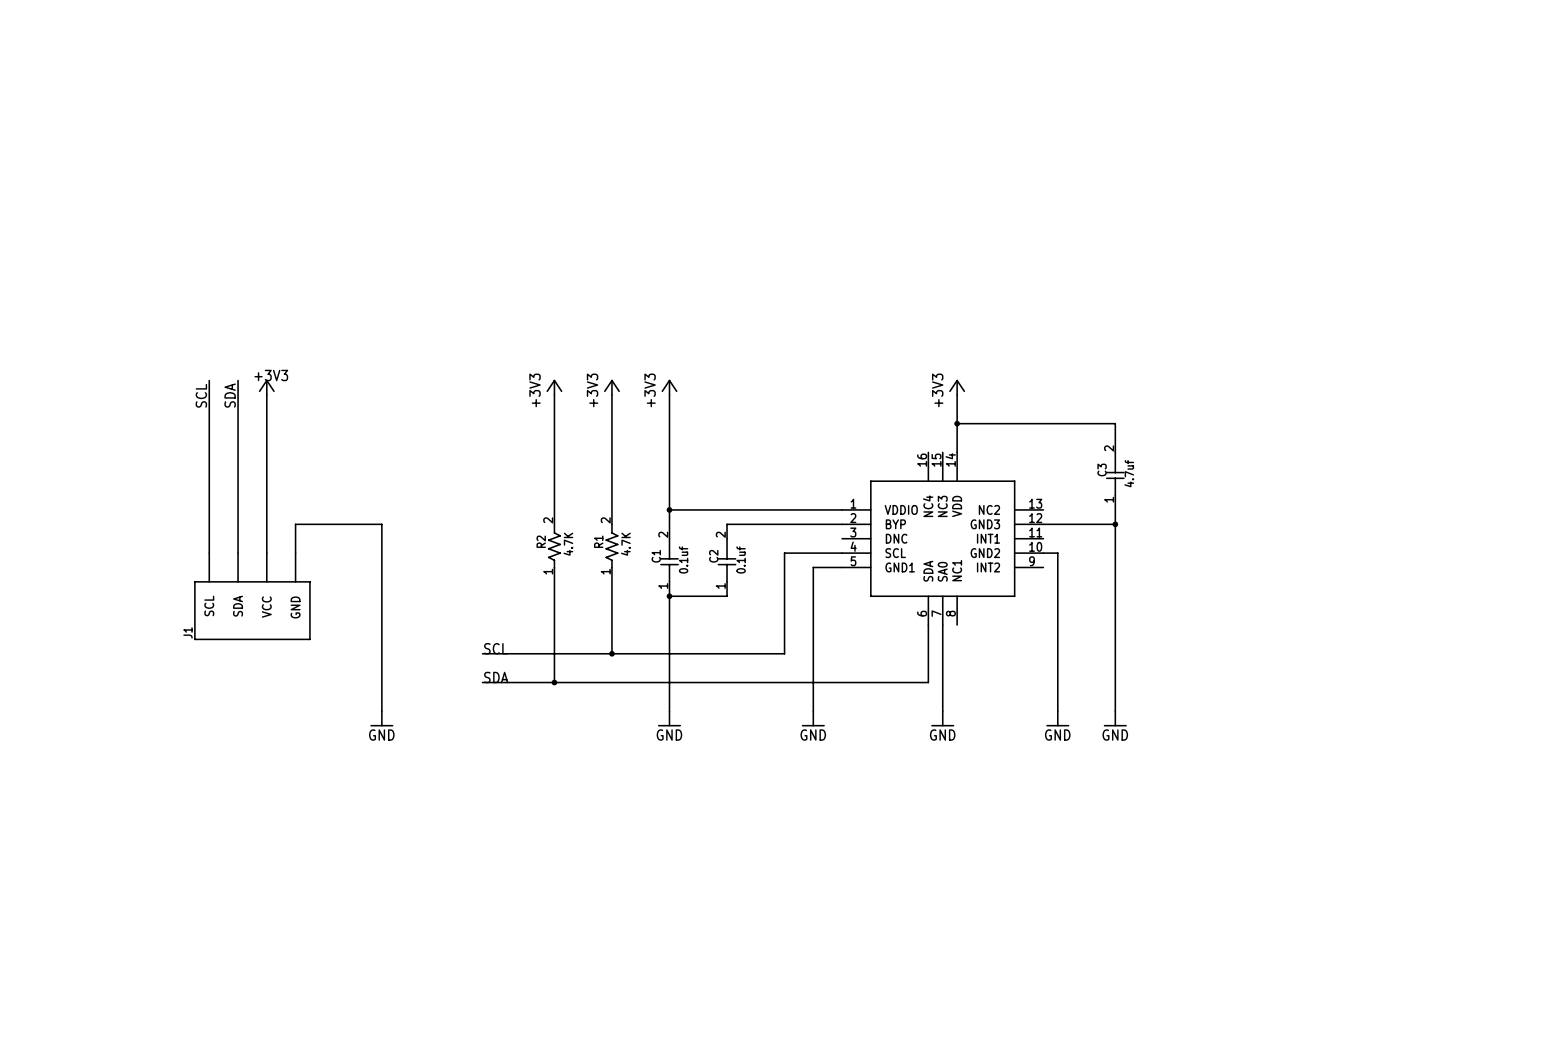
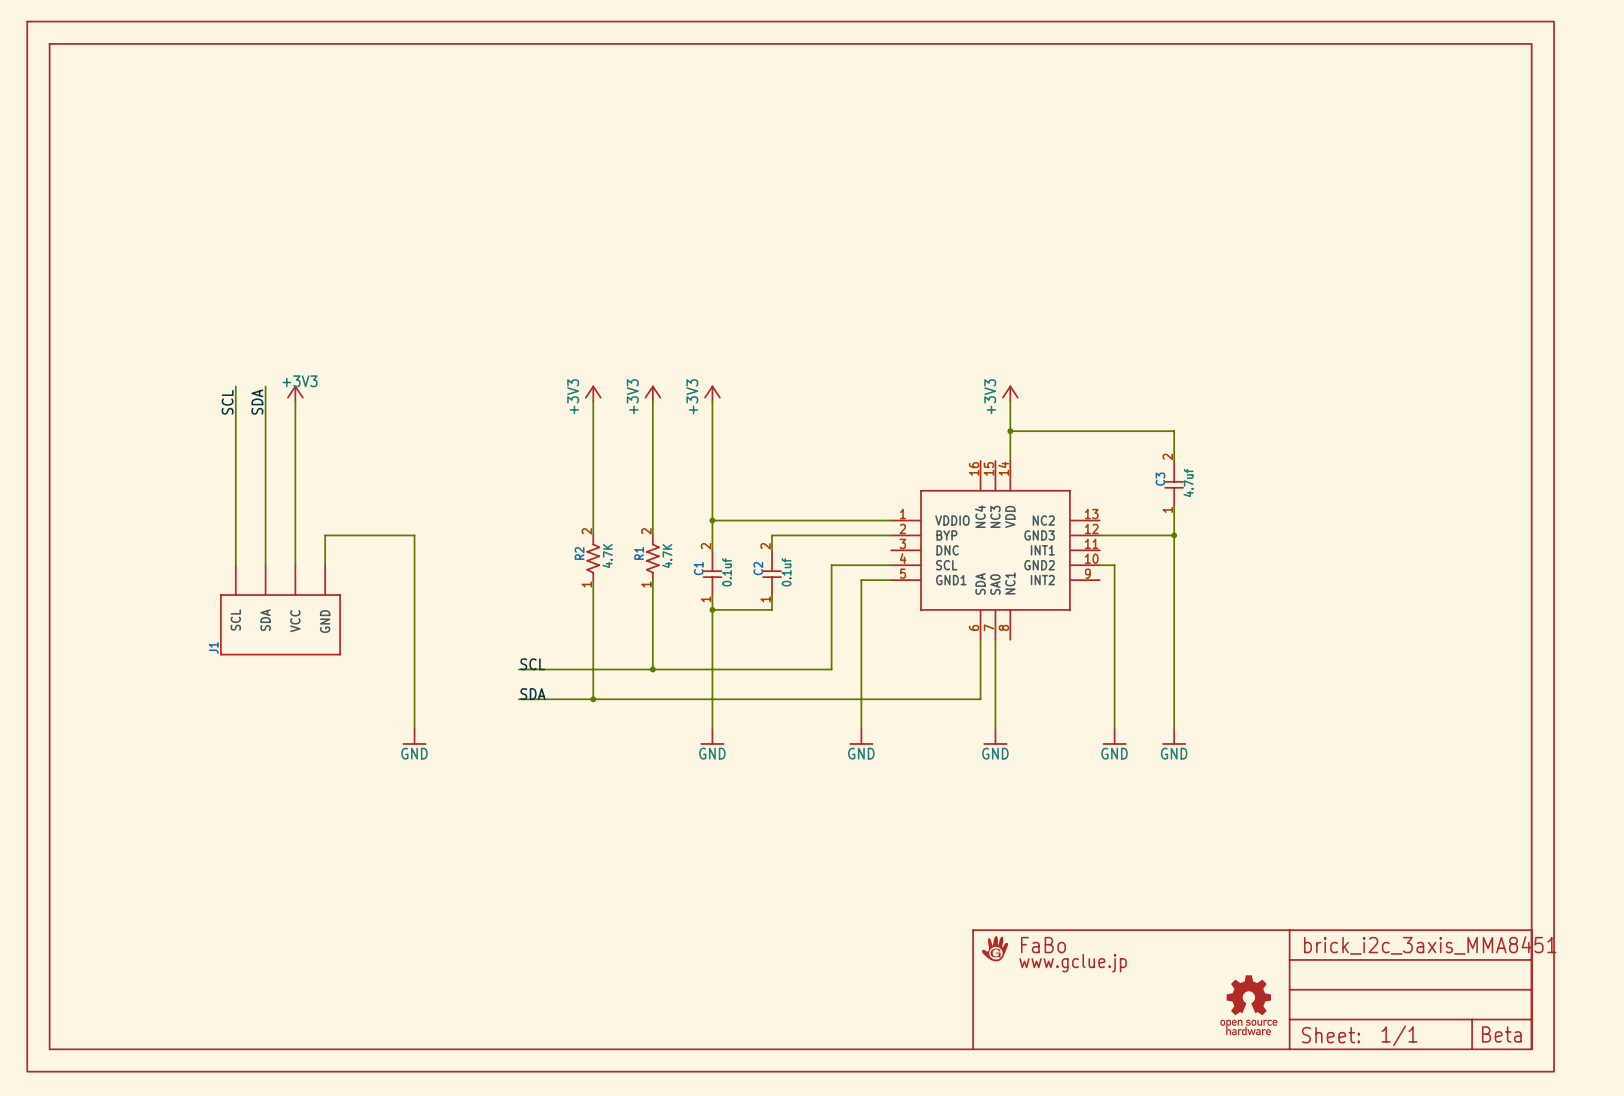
part: none -> (790, 546)
part: none -> (1248, 1005)
text: none -> Beta (1501, 1034)

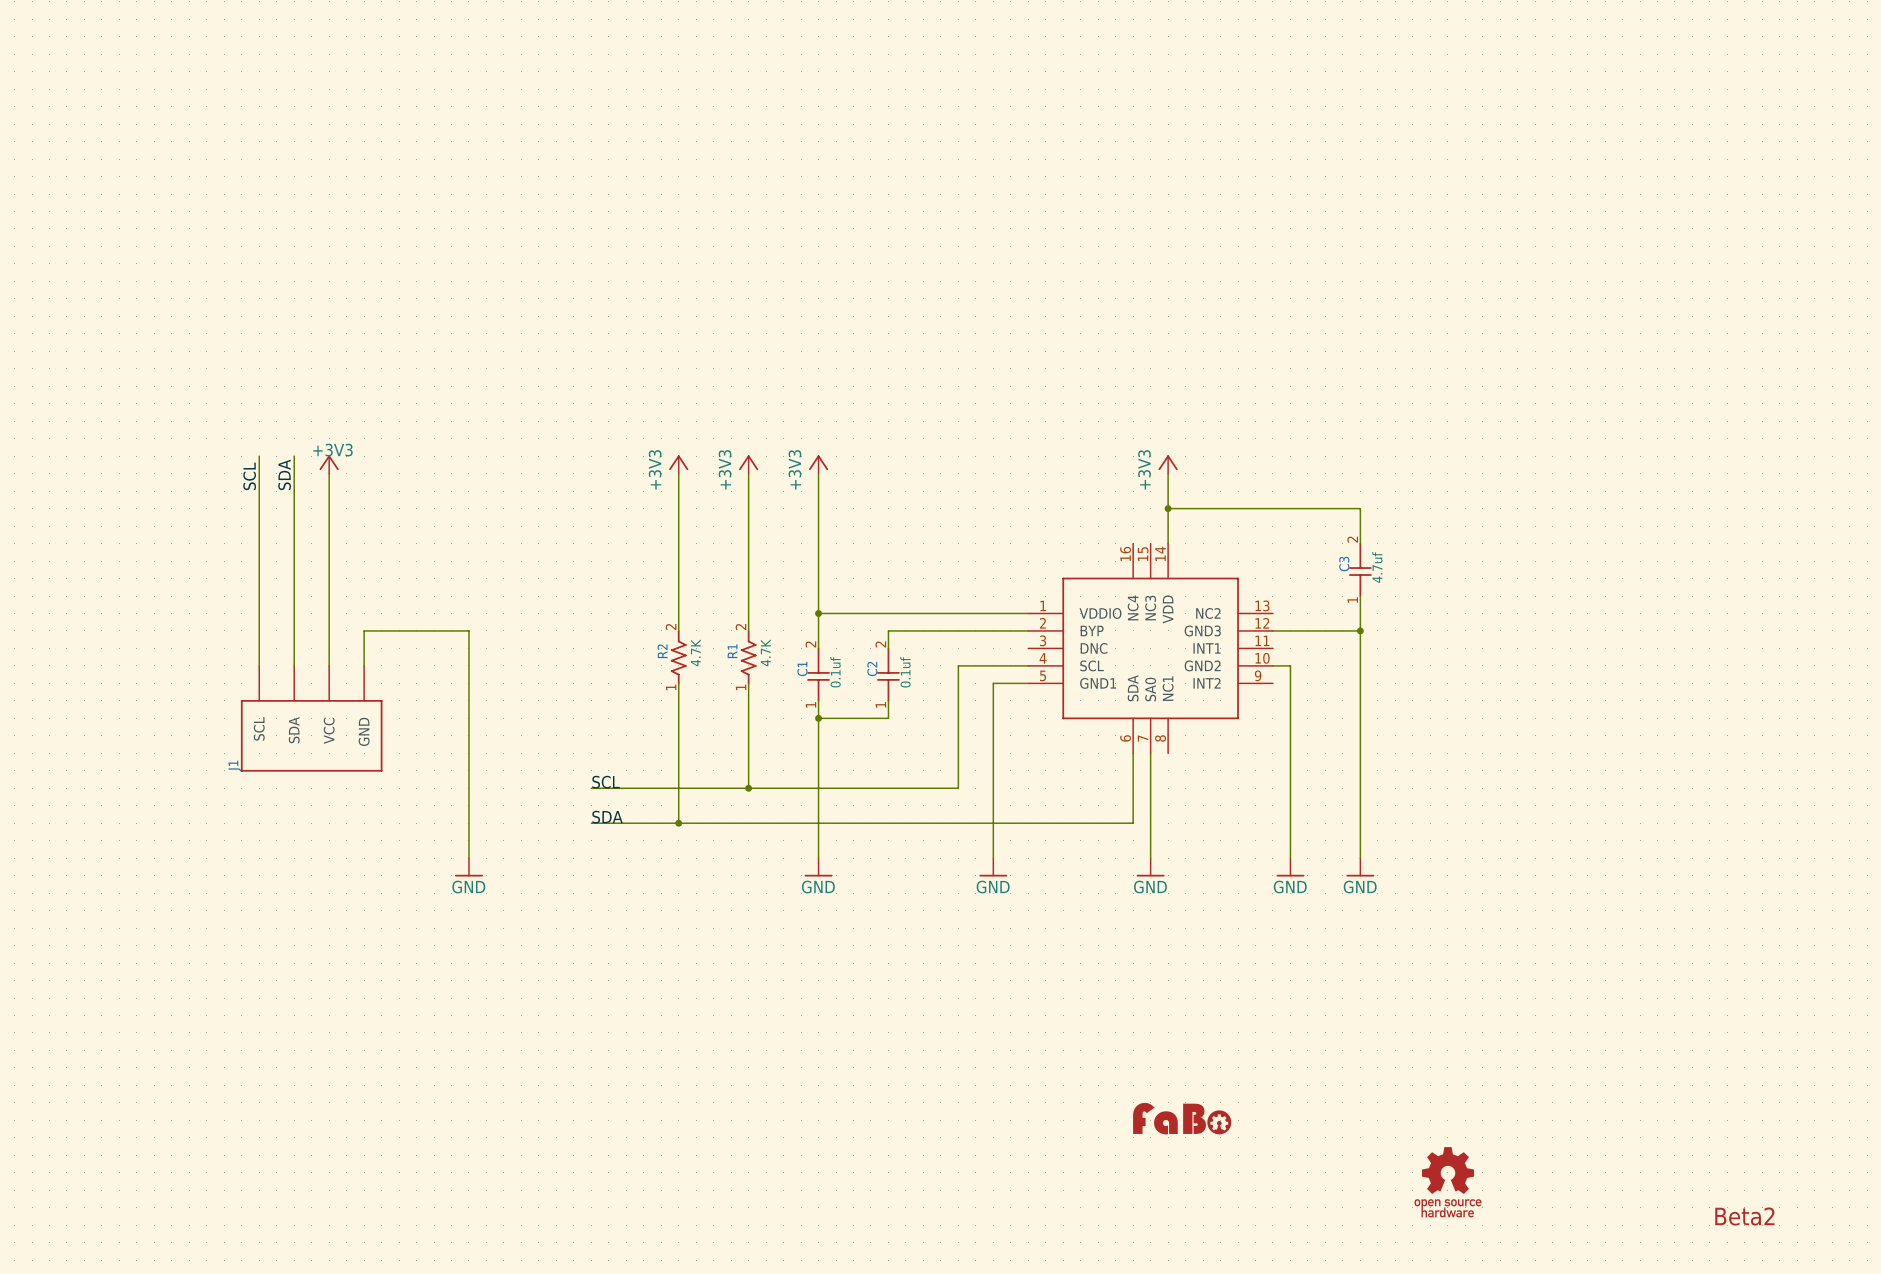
part: (790, 546) -> none
part: none -> (1182, 1118)
text: Beta (1501, 1034) -> Beta2 (1744, 1216)

